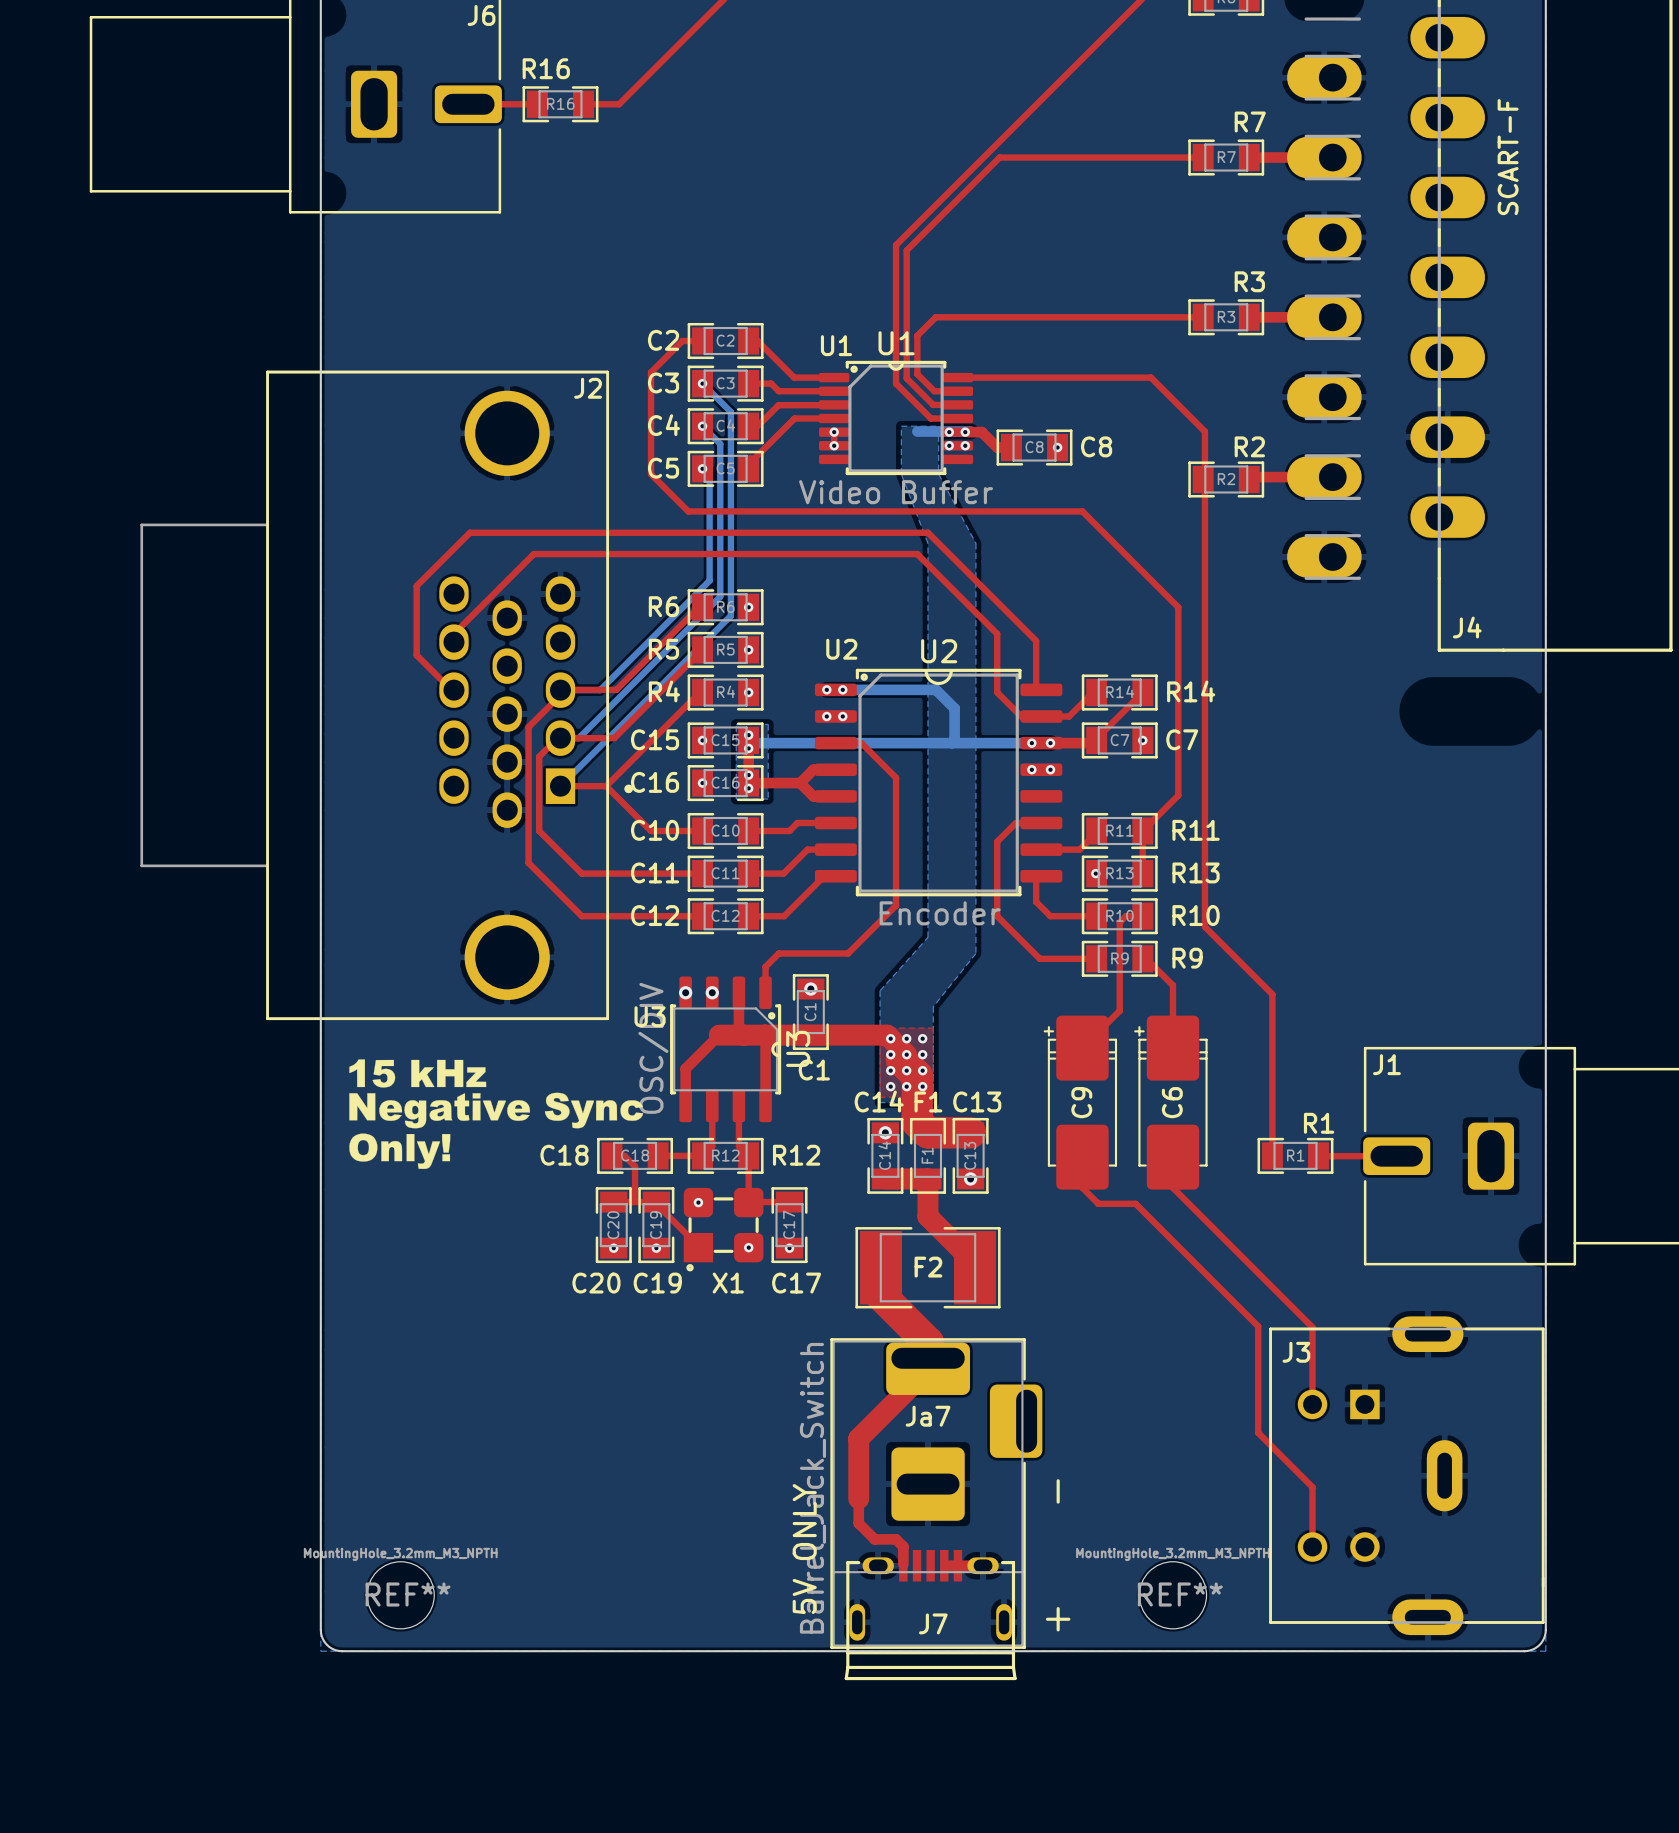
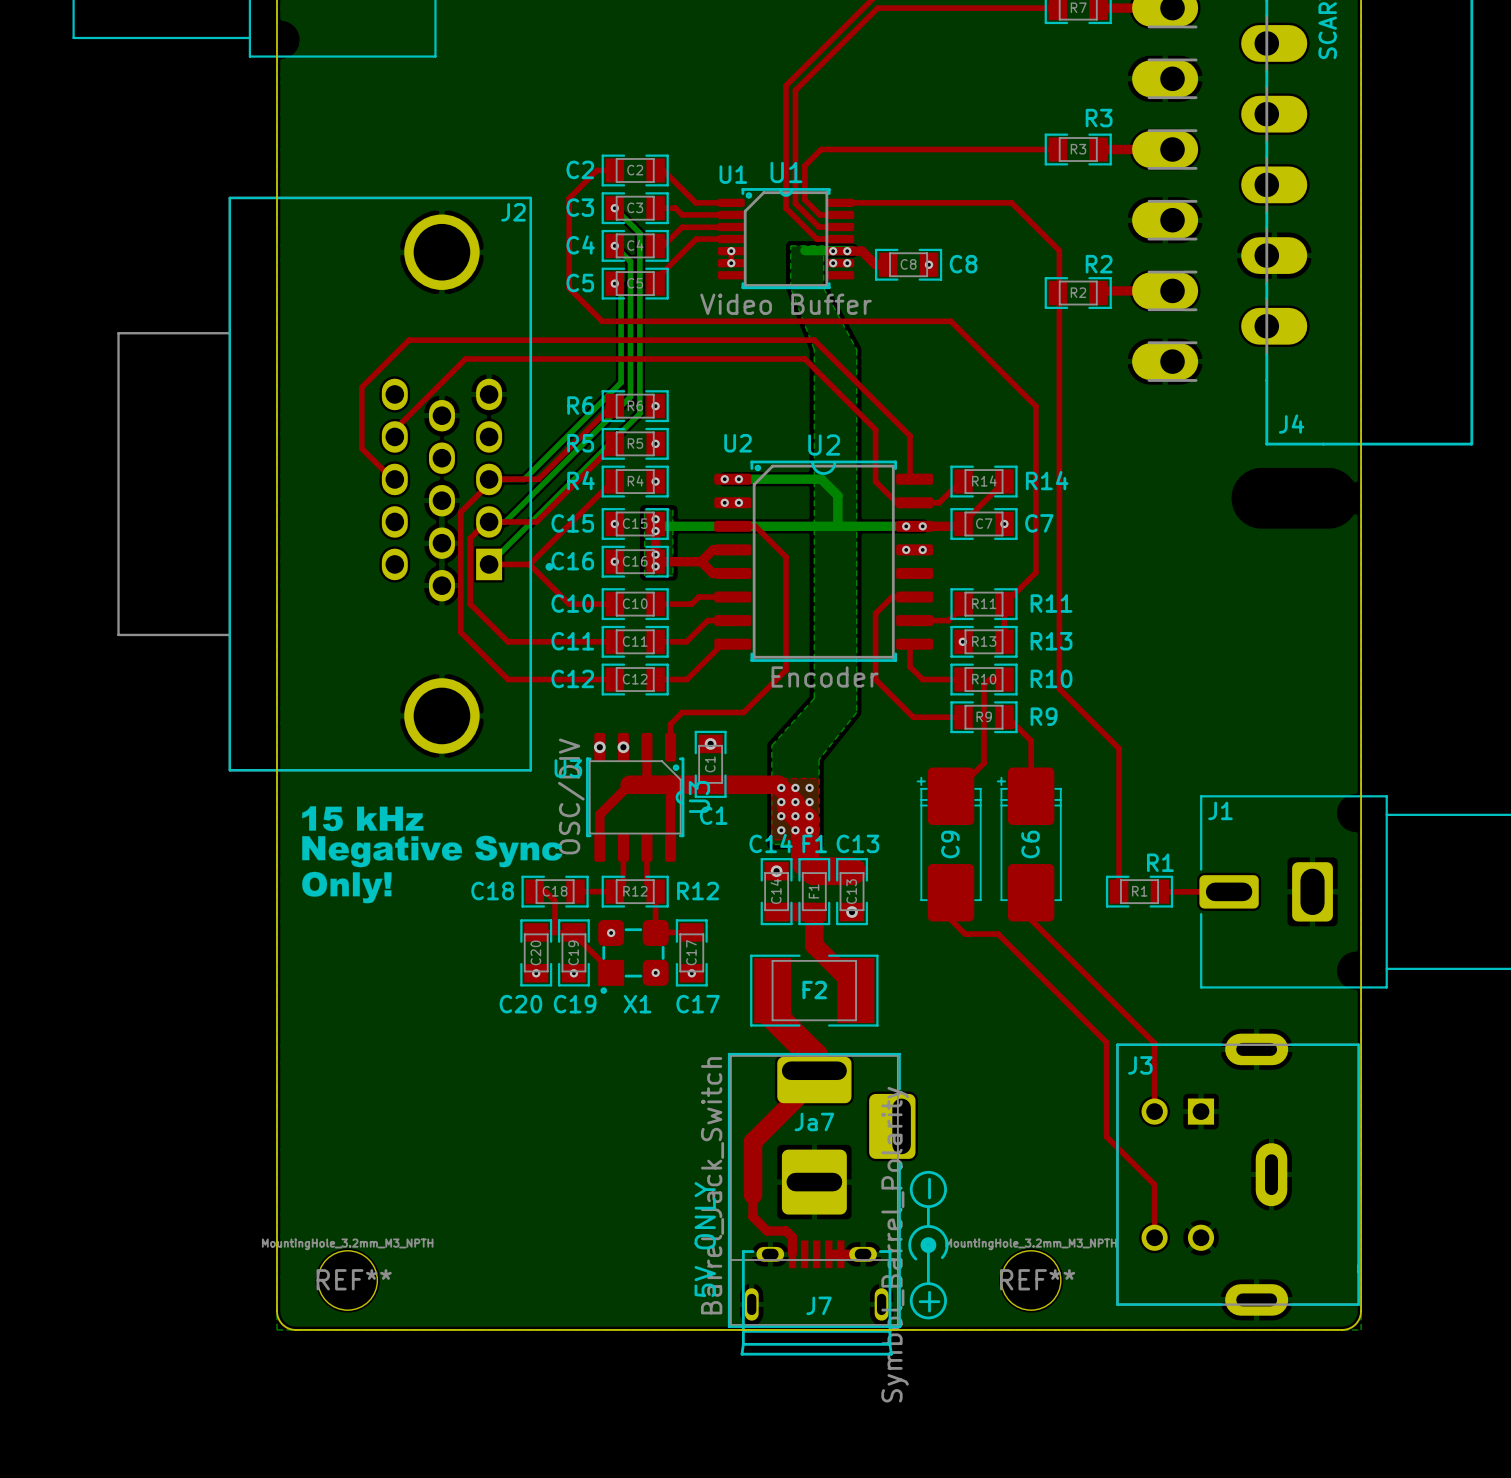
drawing: none -> [908, 1170, 949, 1320]

